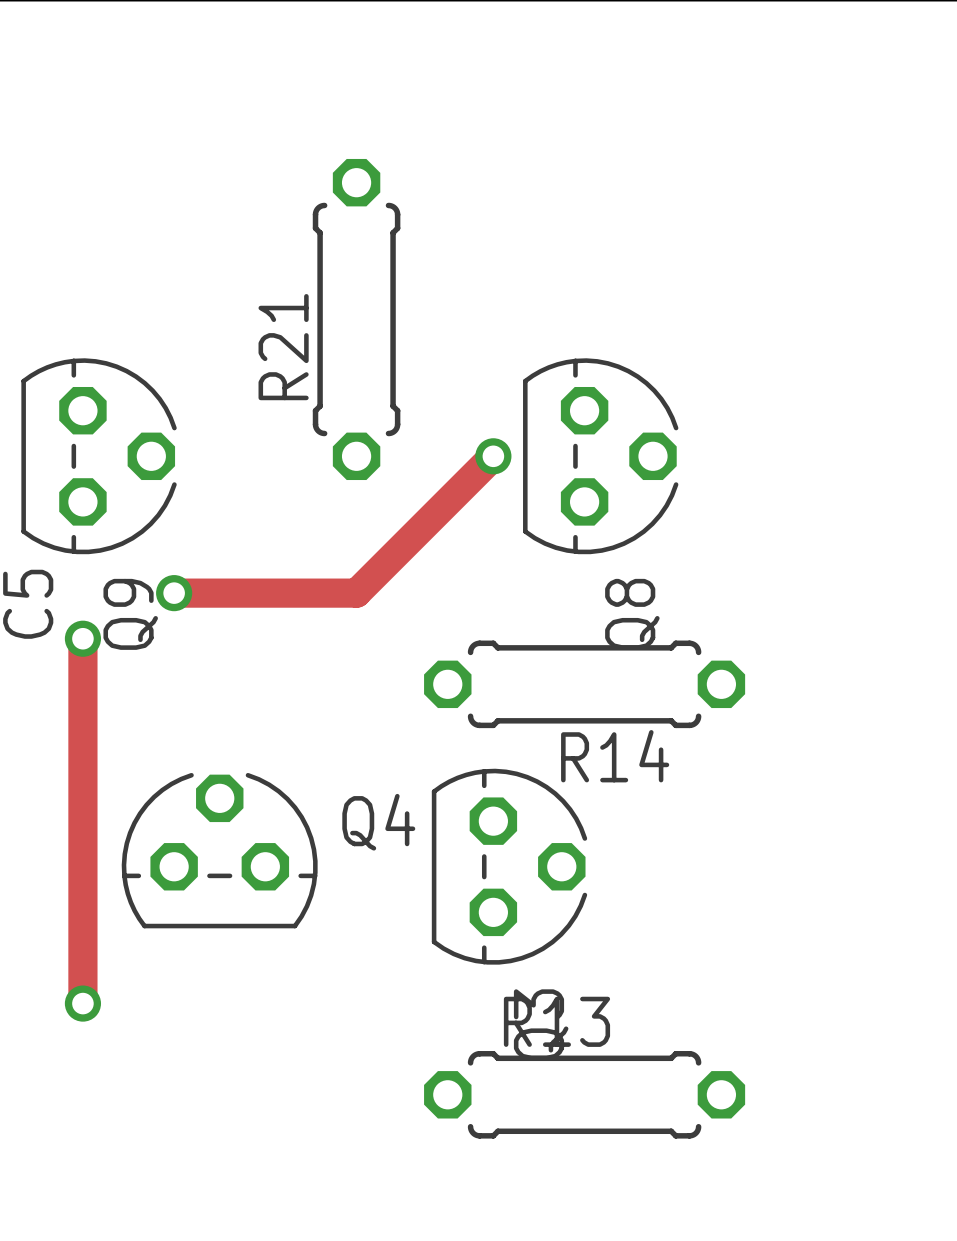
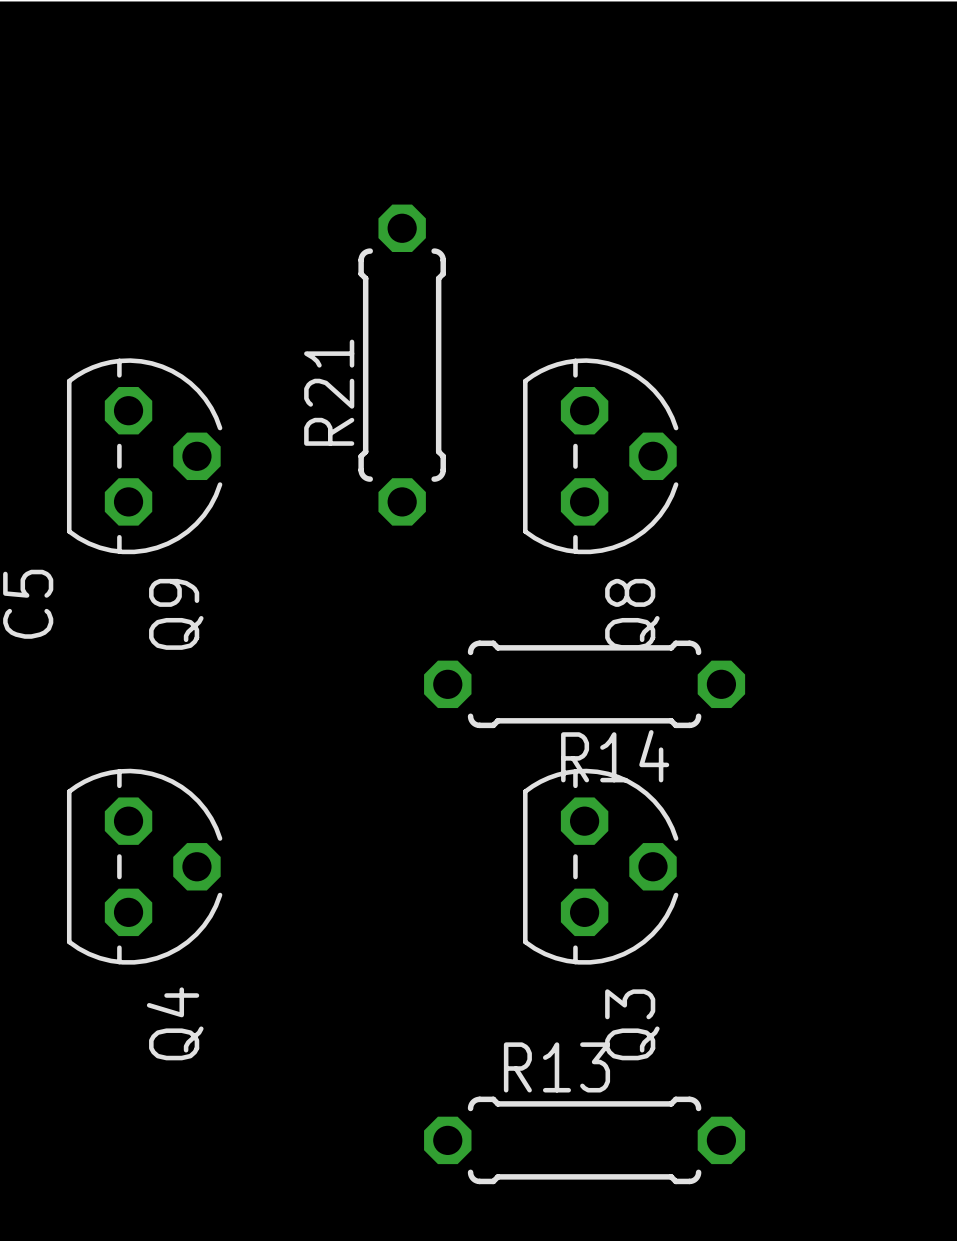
R21 position: (356, 319) -> (402, 365)
Q9 position: (99, 456) -> (144, 456)
track: (493, 456) (356, 593) (174, 593) -> none
via: (493, 456) -> none
via: (174, 593) -> none
track: (82, 638) (82, 1003) -> none
via: (82, 638) -> none
Q4 rotation: 0° (219, 850) -> 90° clockwise (144, 866)
Q3 position: (509, 866) -> (600, 866)
via: (82, 1003) -> none
R13 position: (584, 1094) -> (584, 1140)

